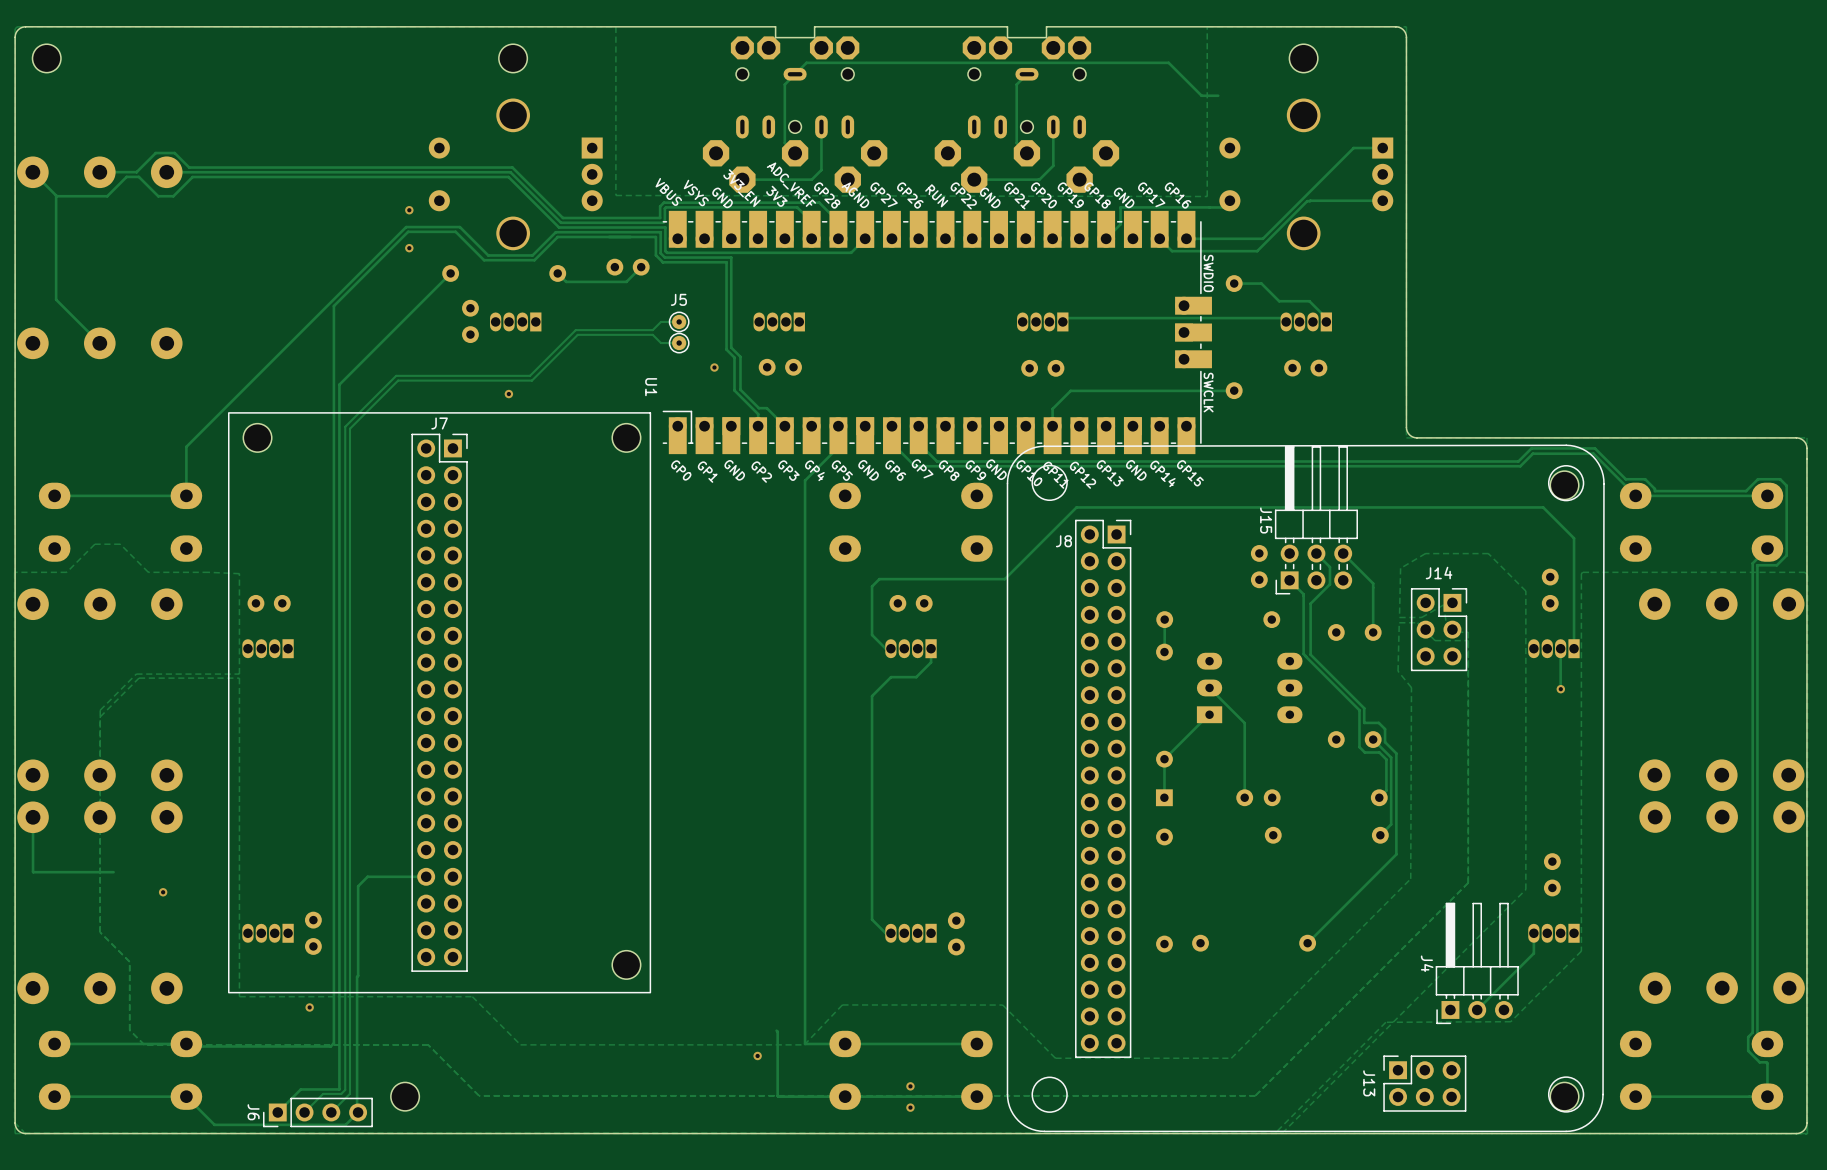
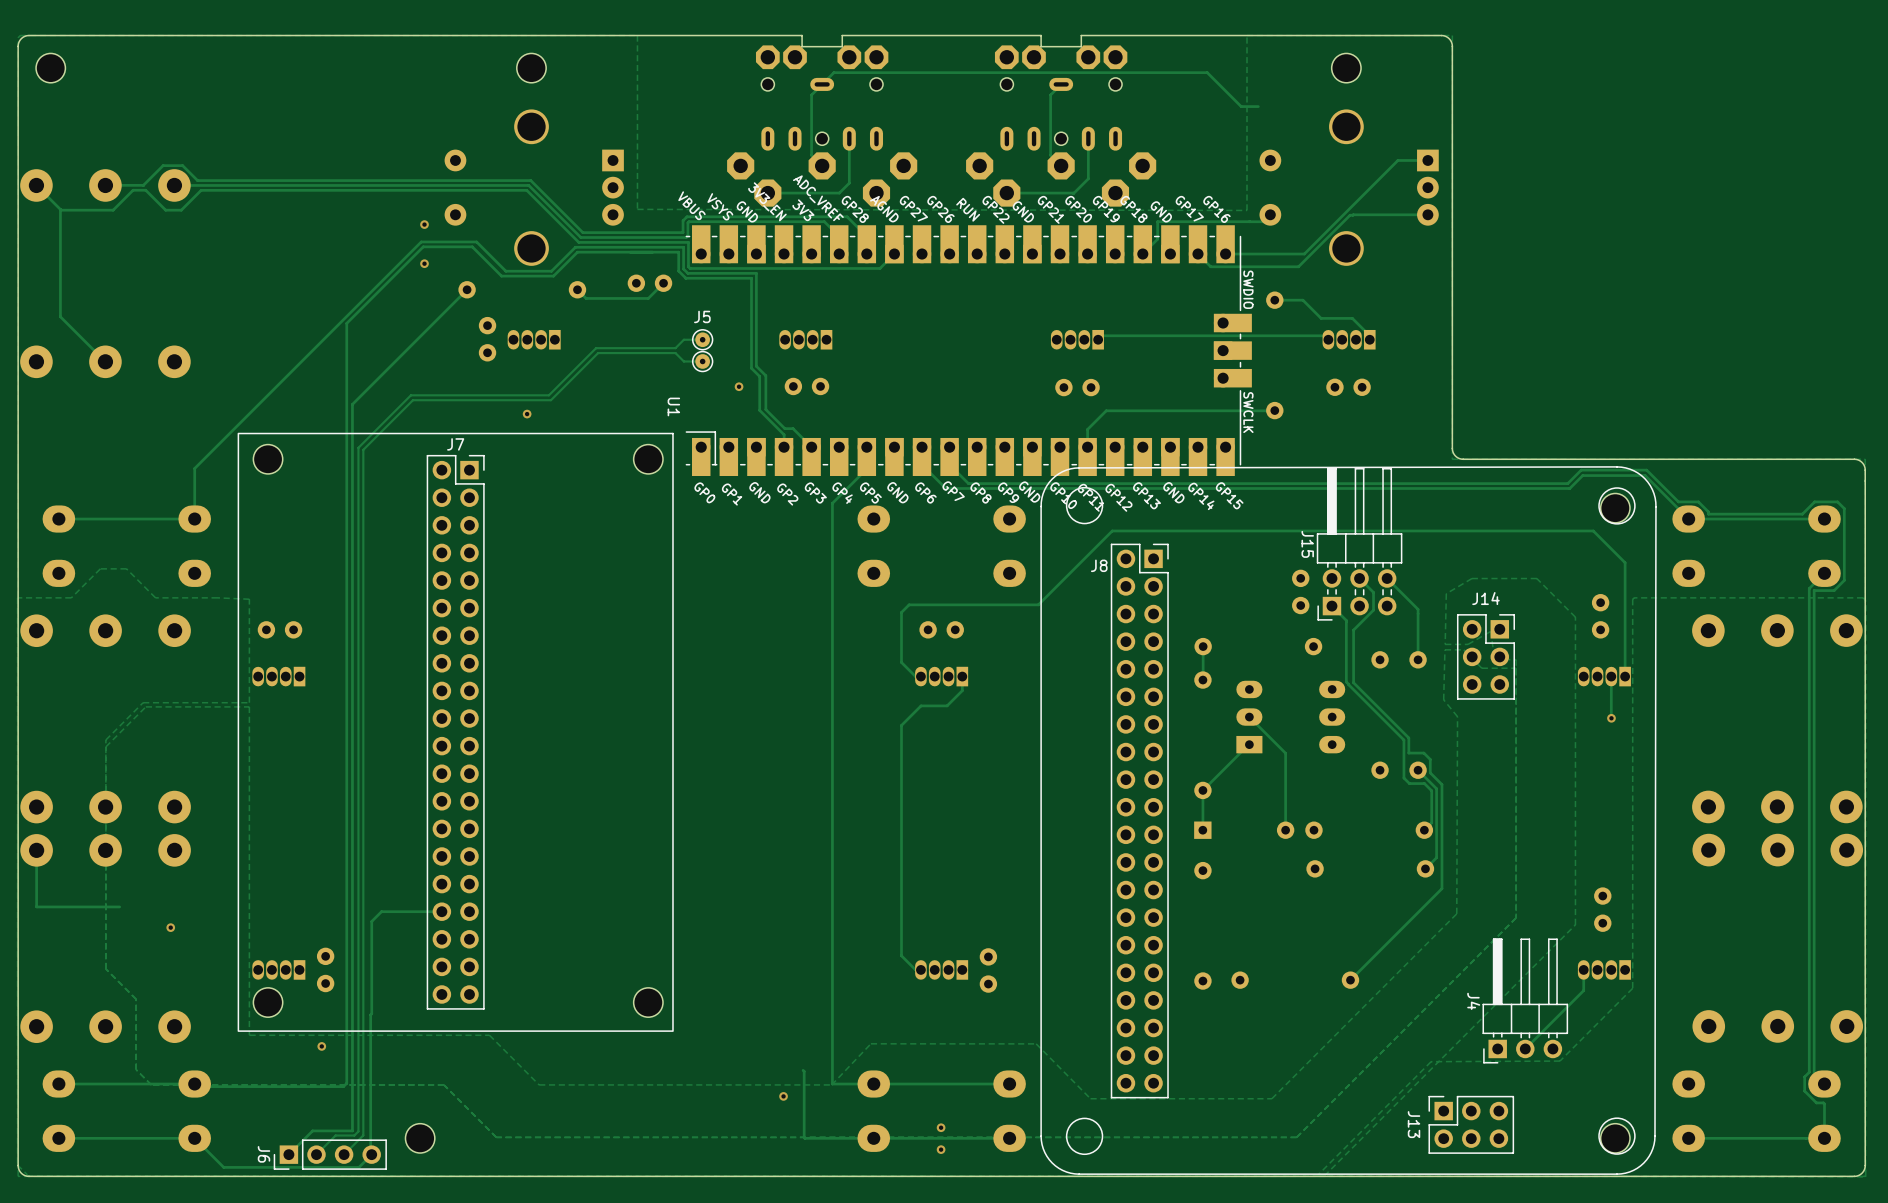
part: none -> (268, 1002)

